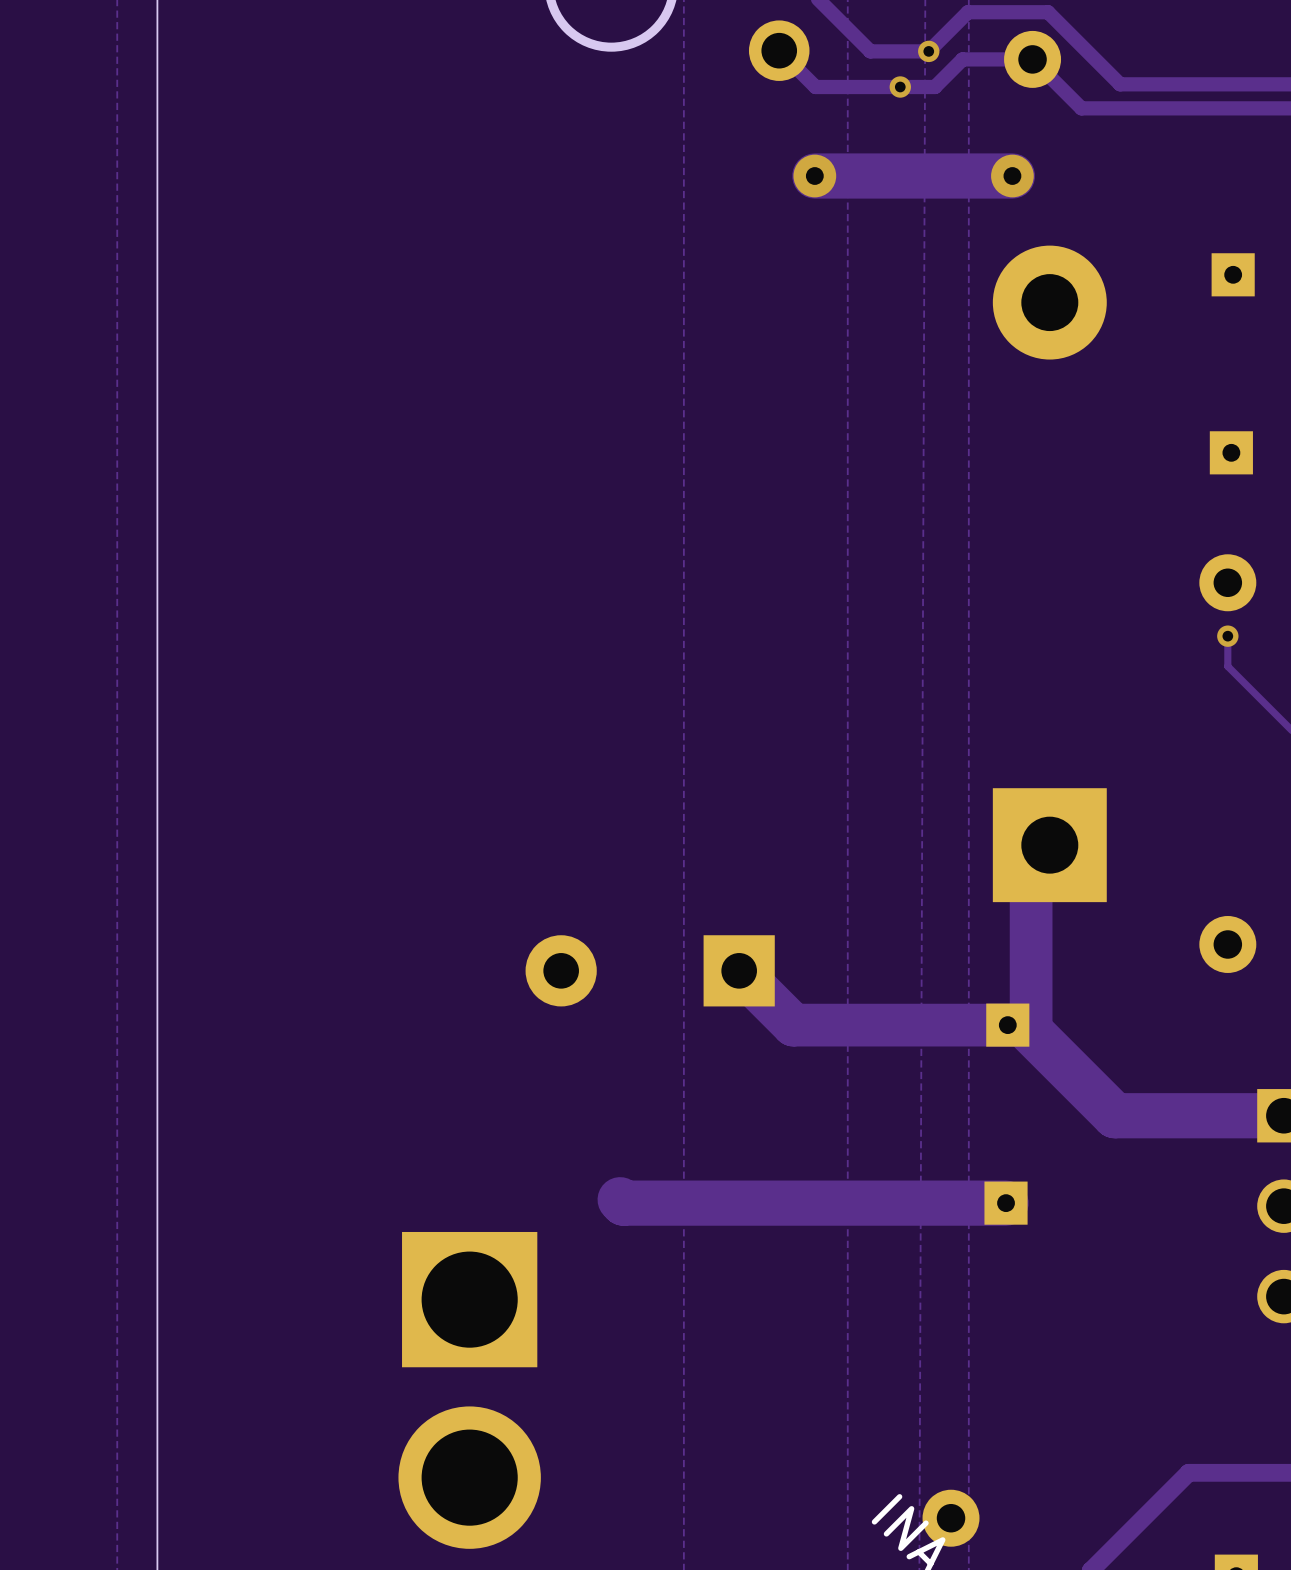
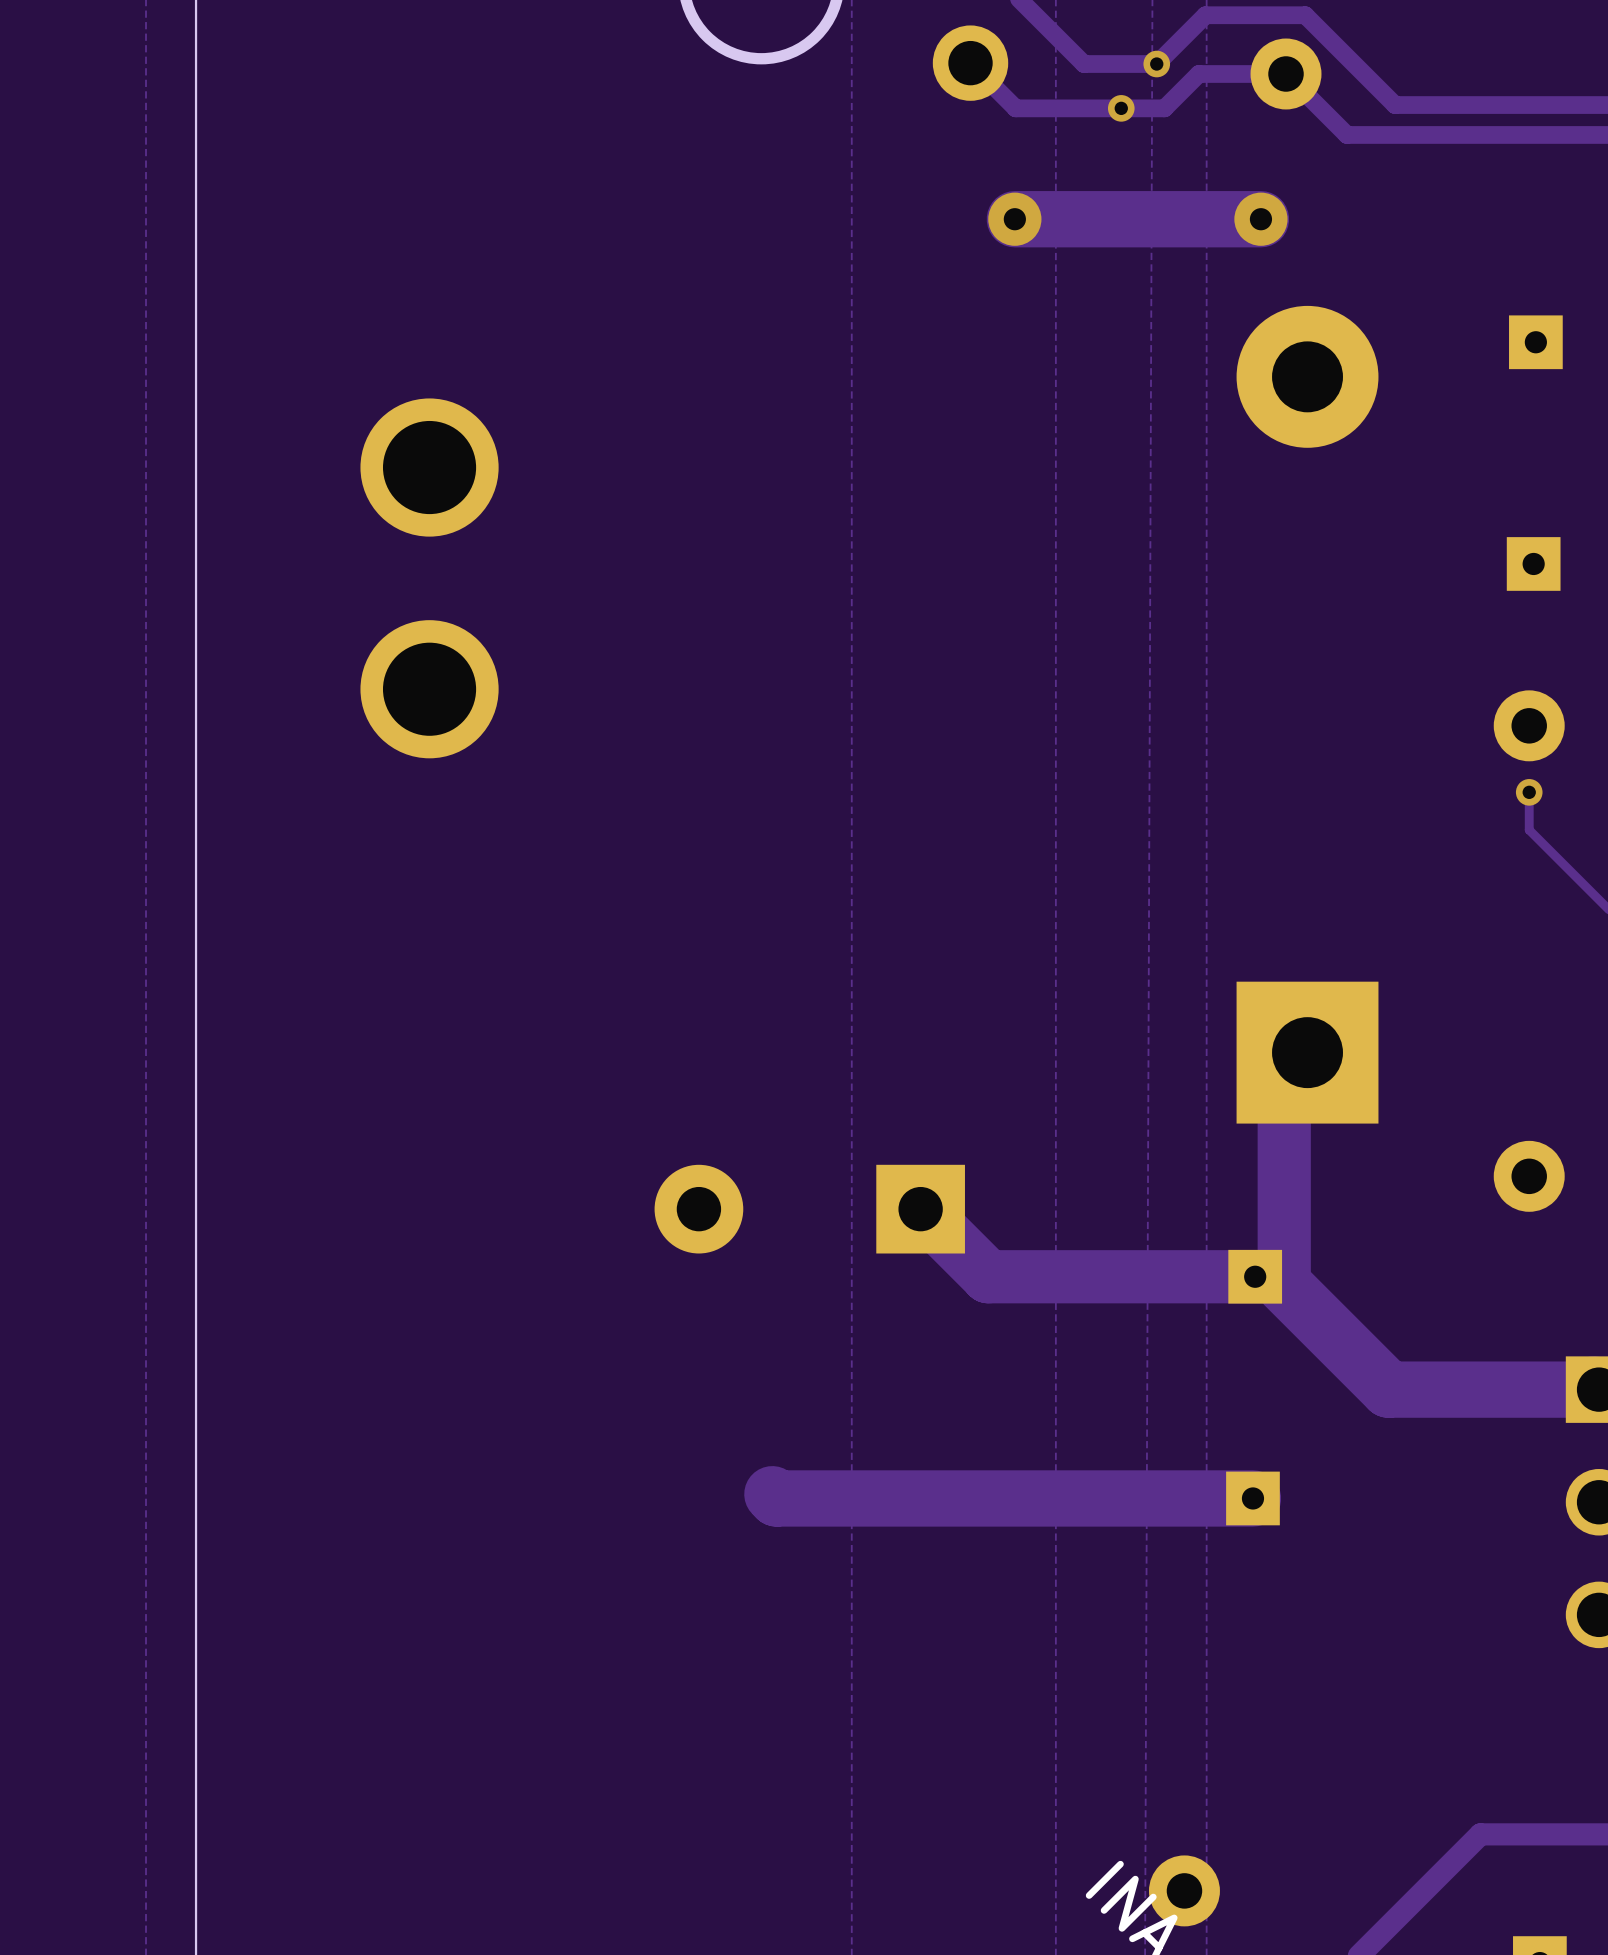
part: none -> (429, 578)
part: (469, 1390) -> none

